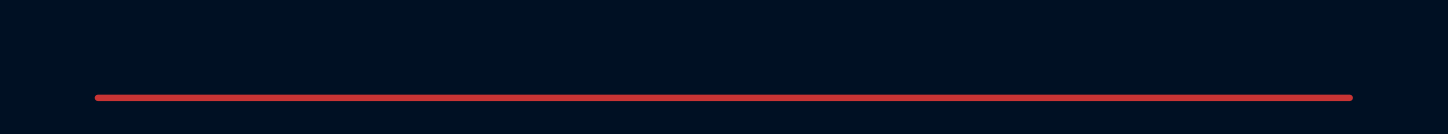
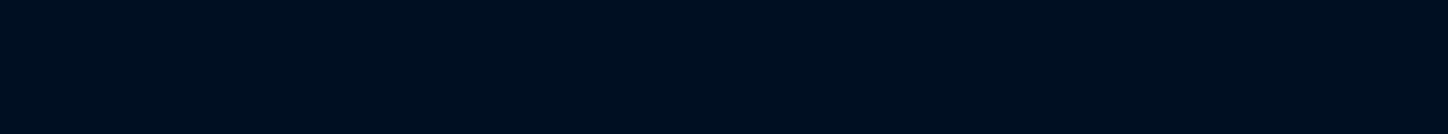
top track: (97, 97) (1349, 97) -> none

